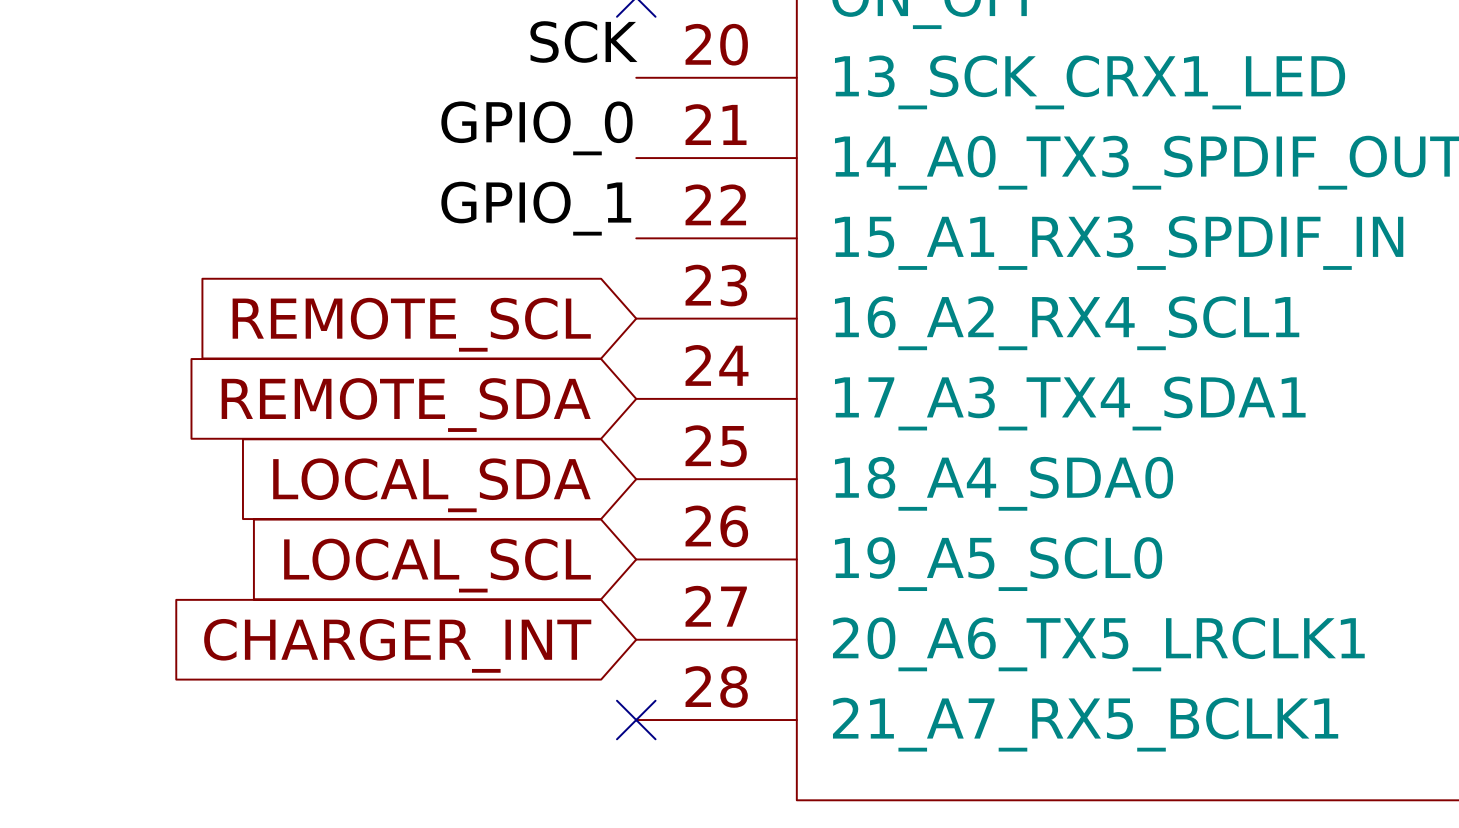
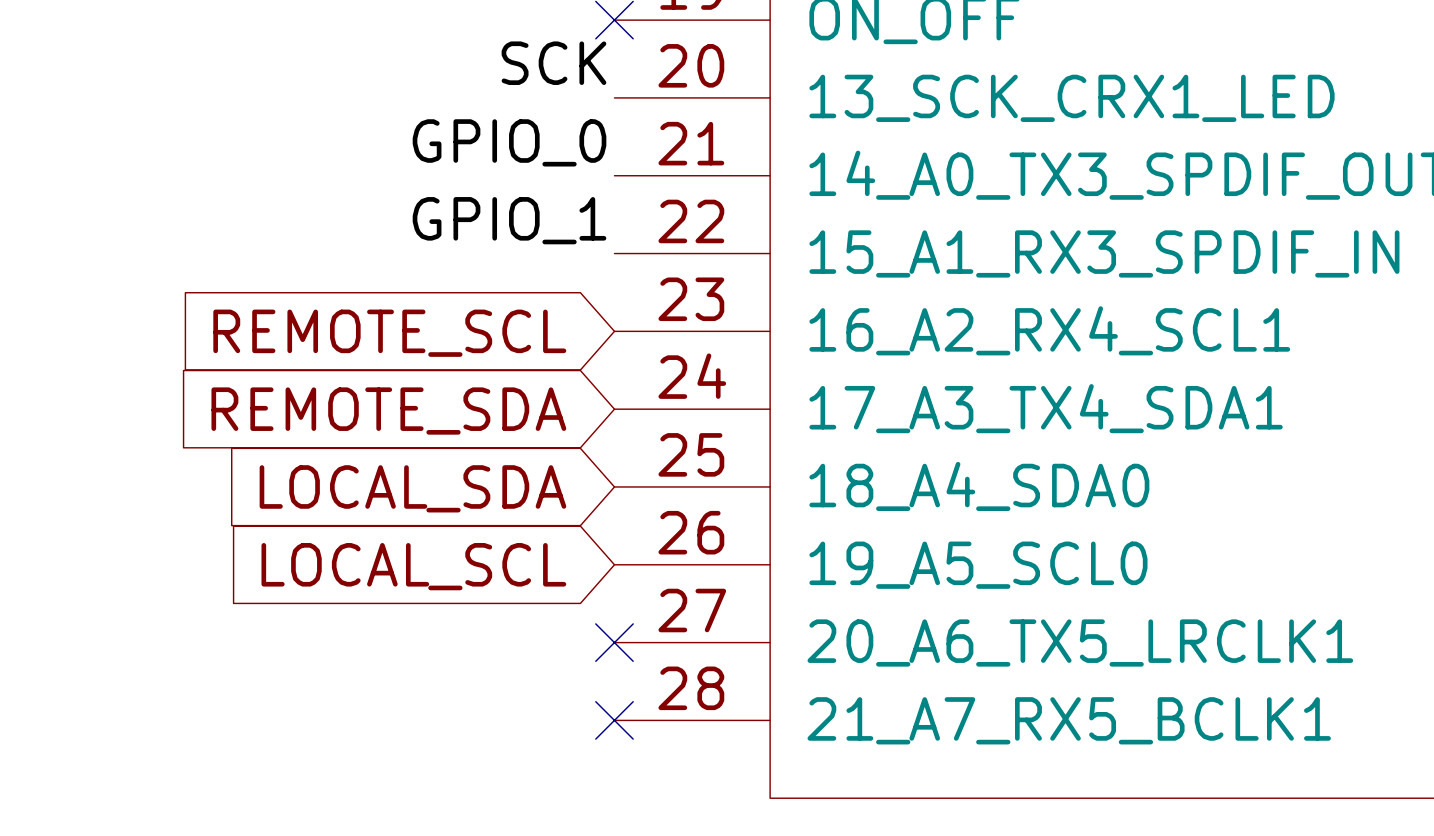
no-connect mark: none -> (614, 642)
global label: CHARGER_INT (397, 645) -> none

